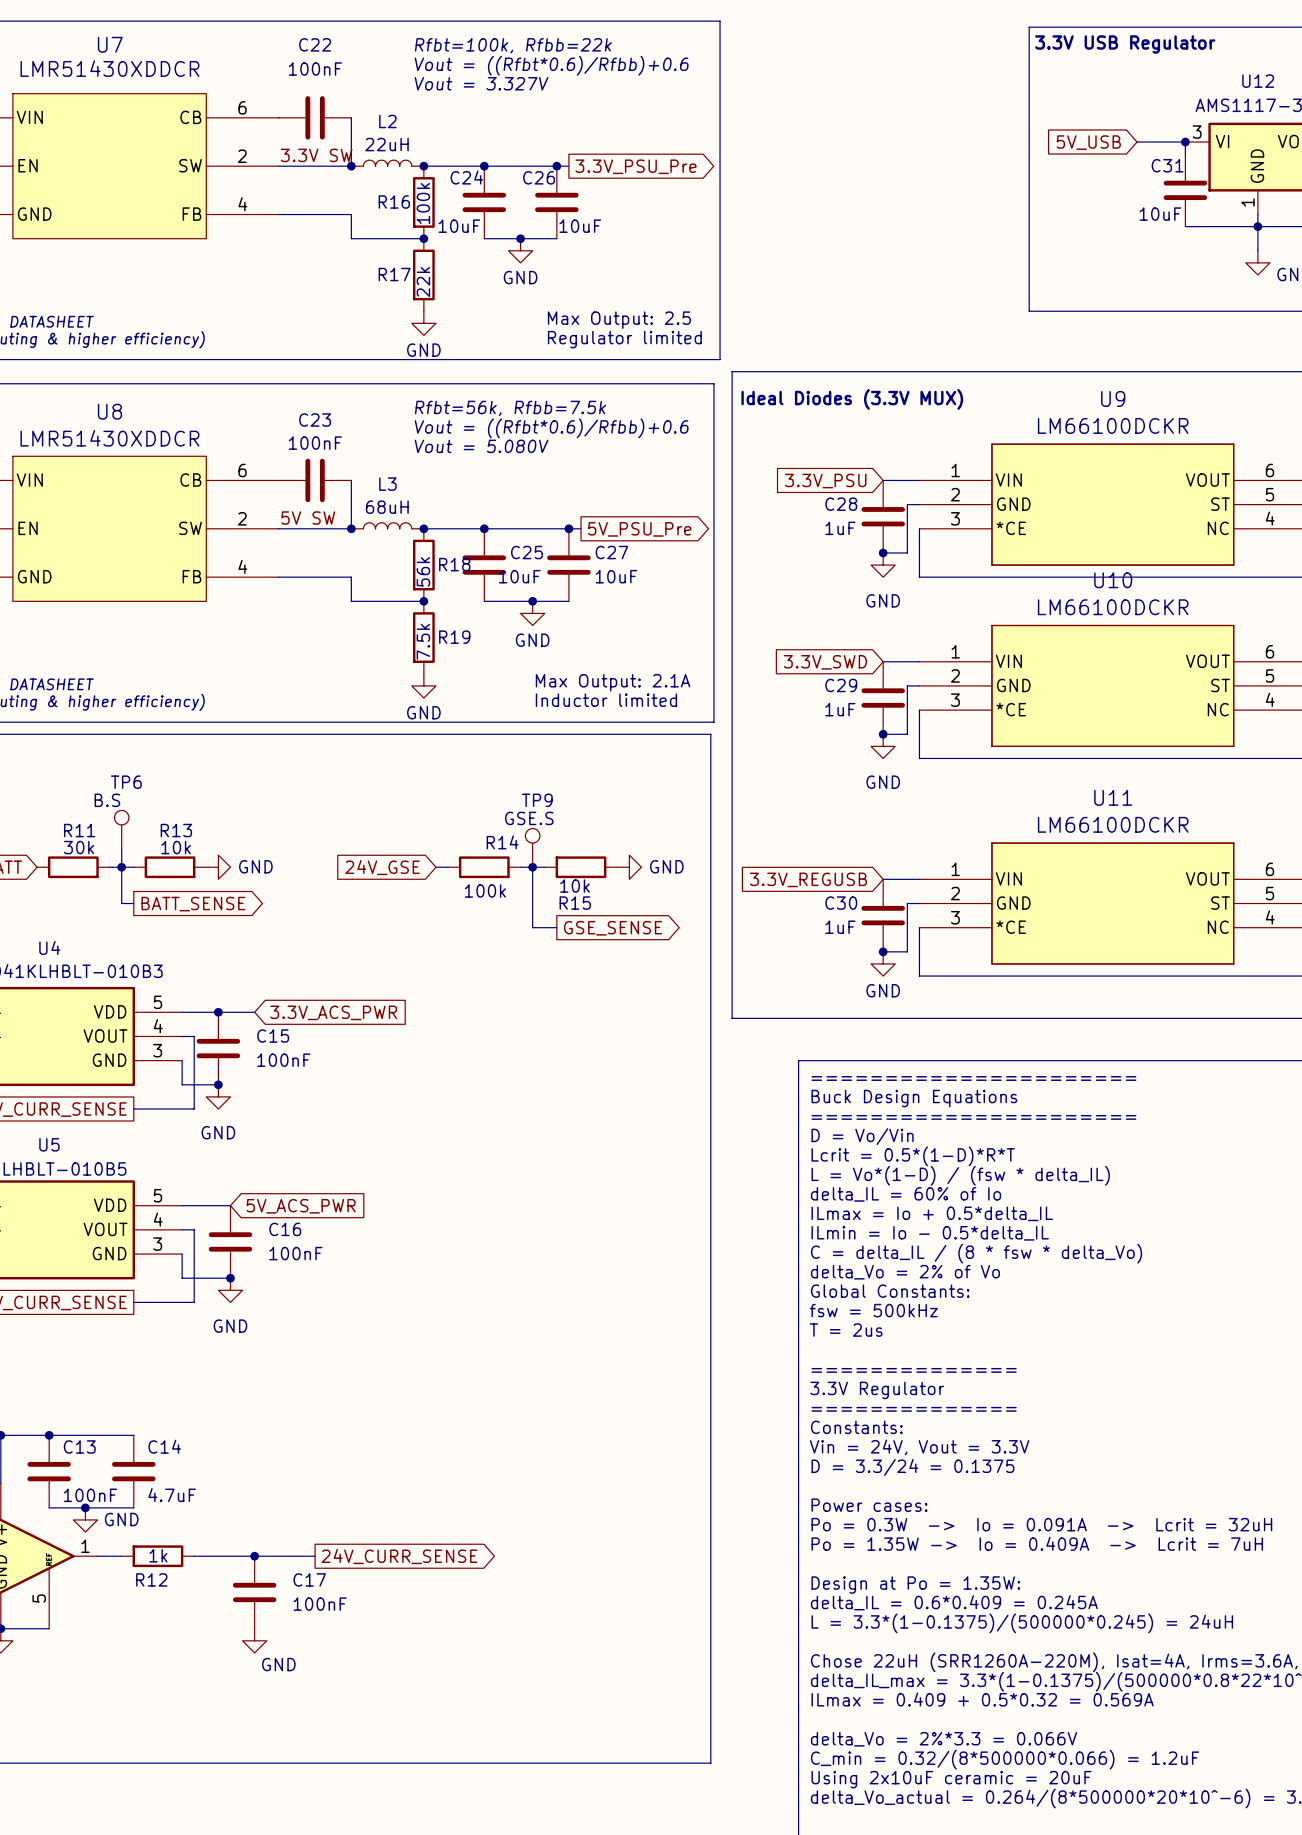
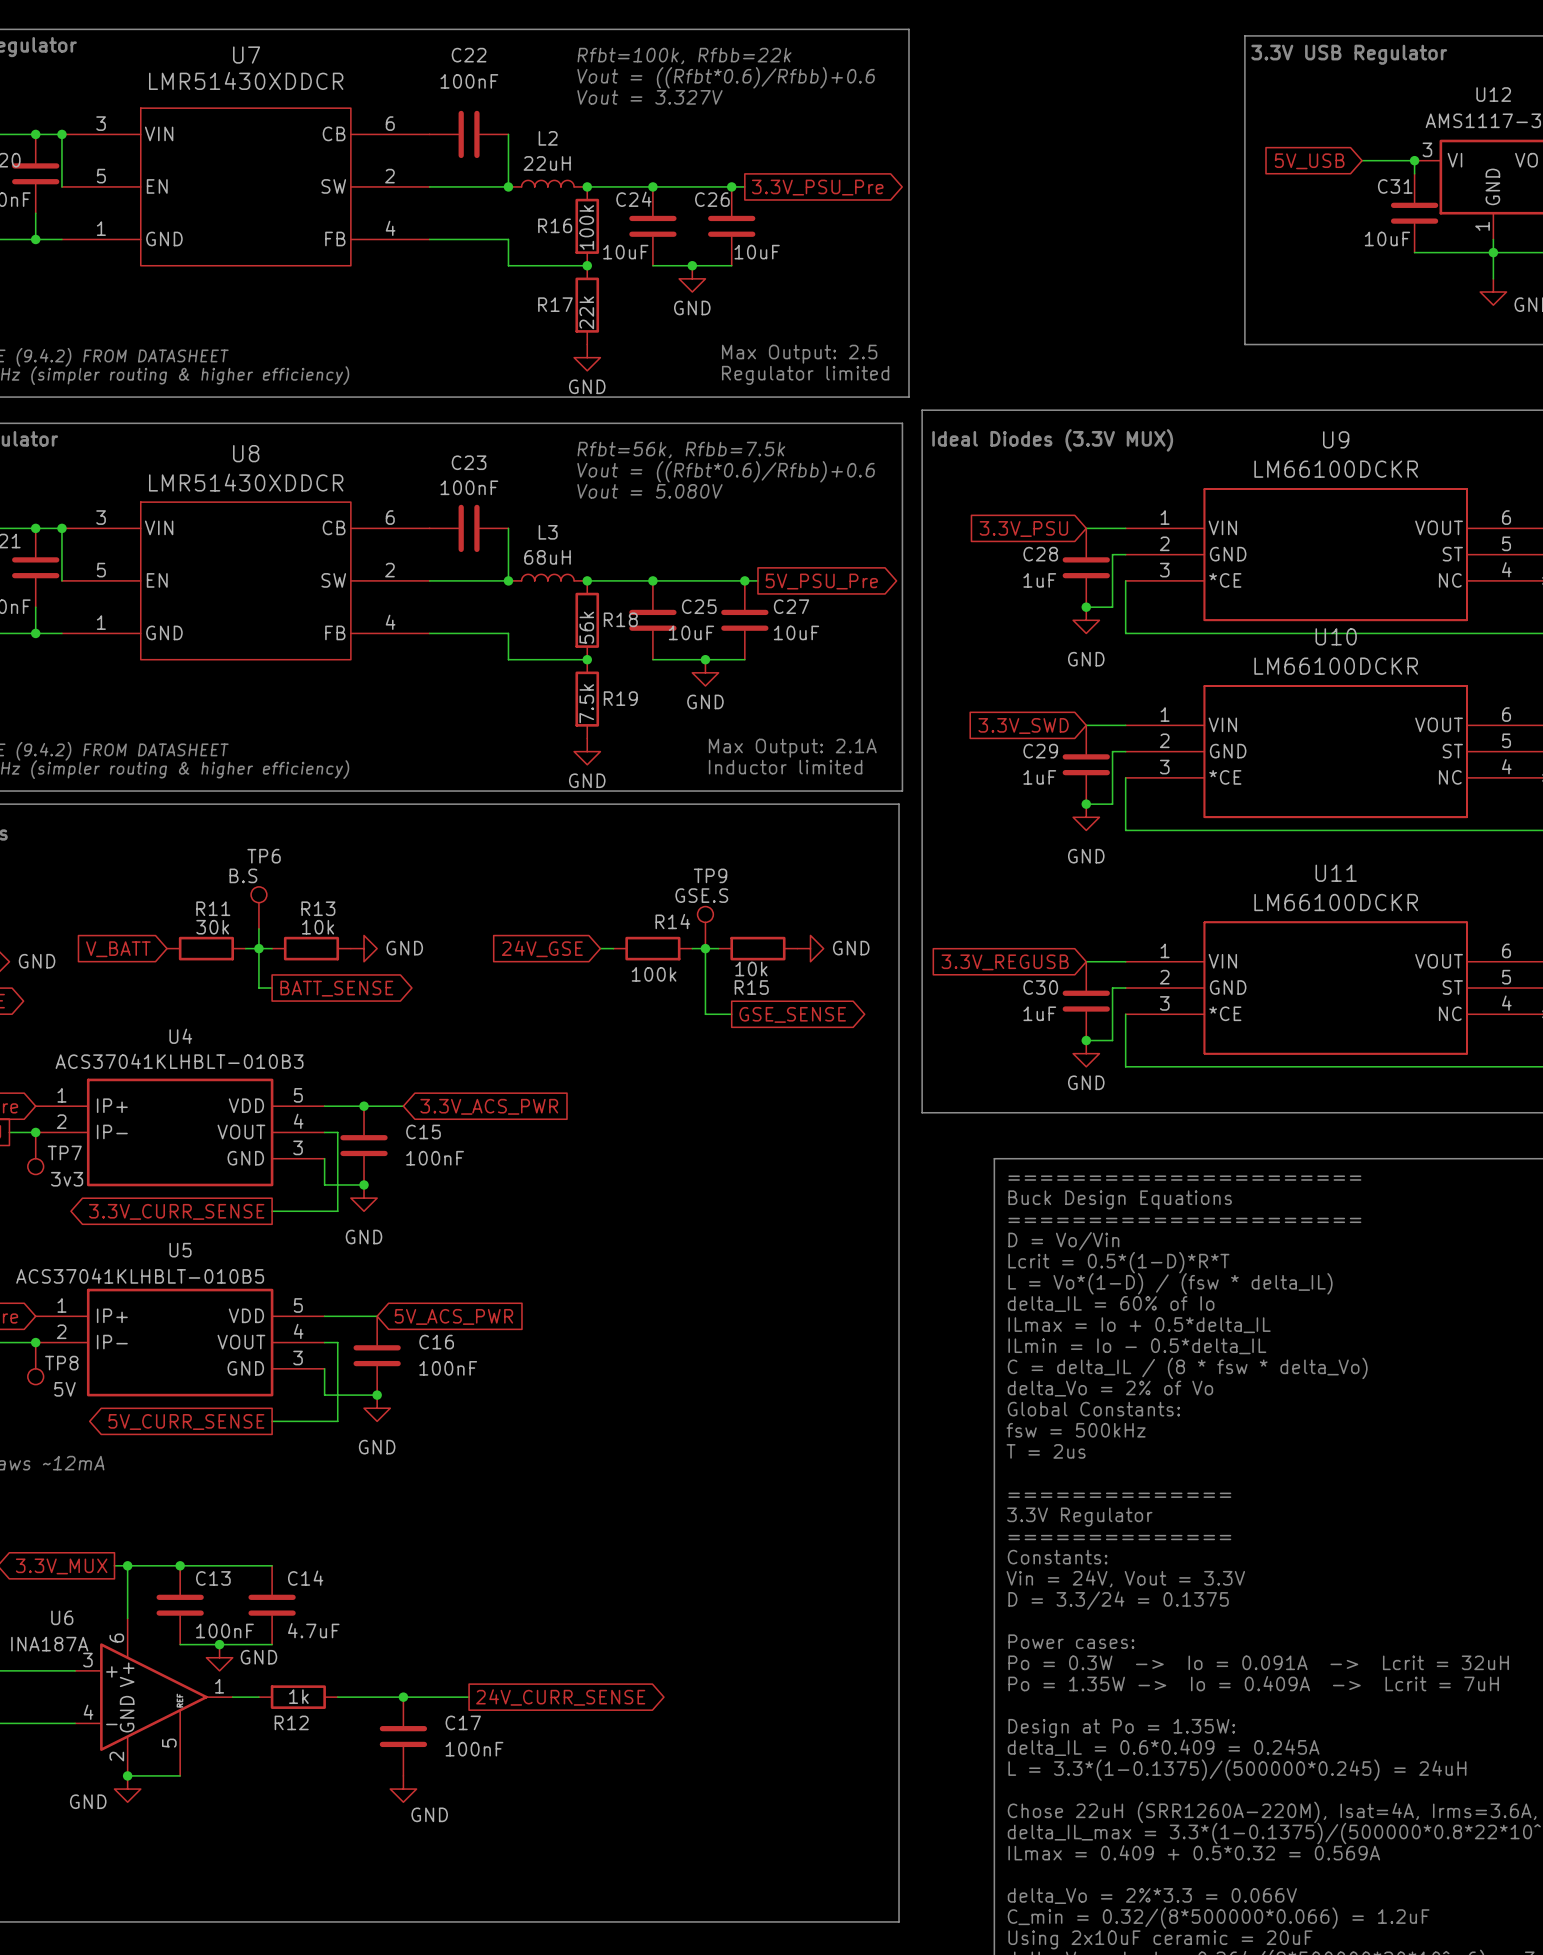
label: 3.3V SW (316, 155) -> none
label: 5V SW (308, 518) -> none

